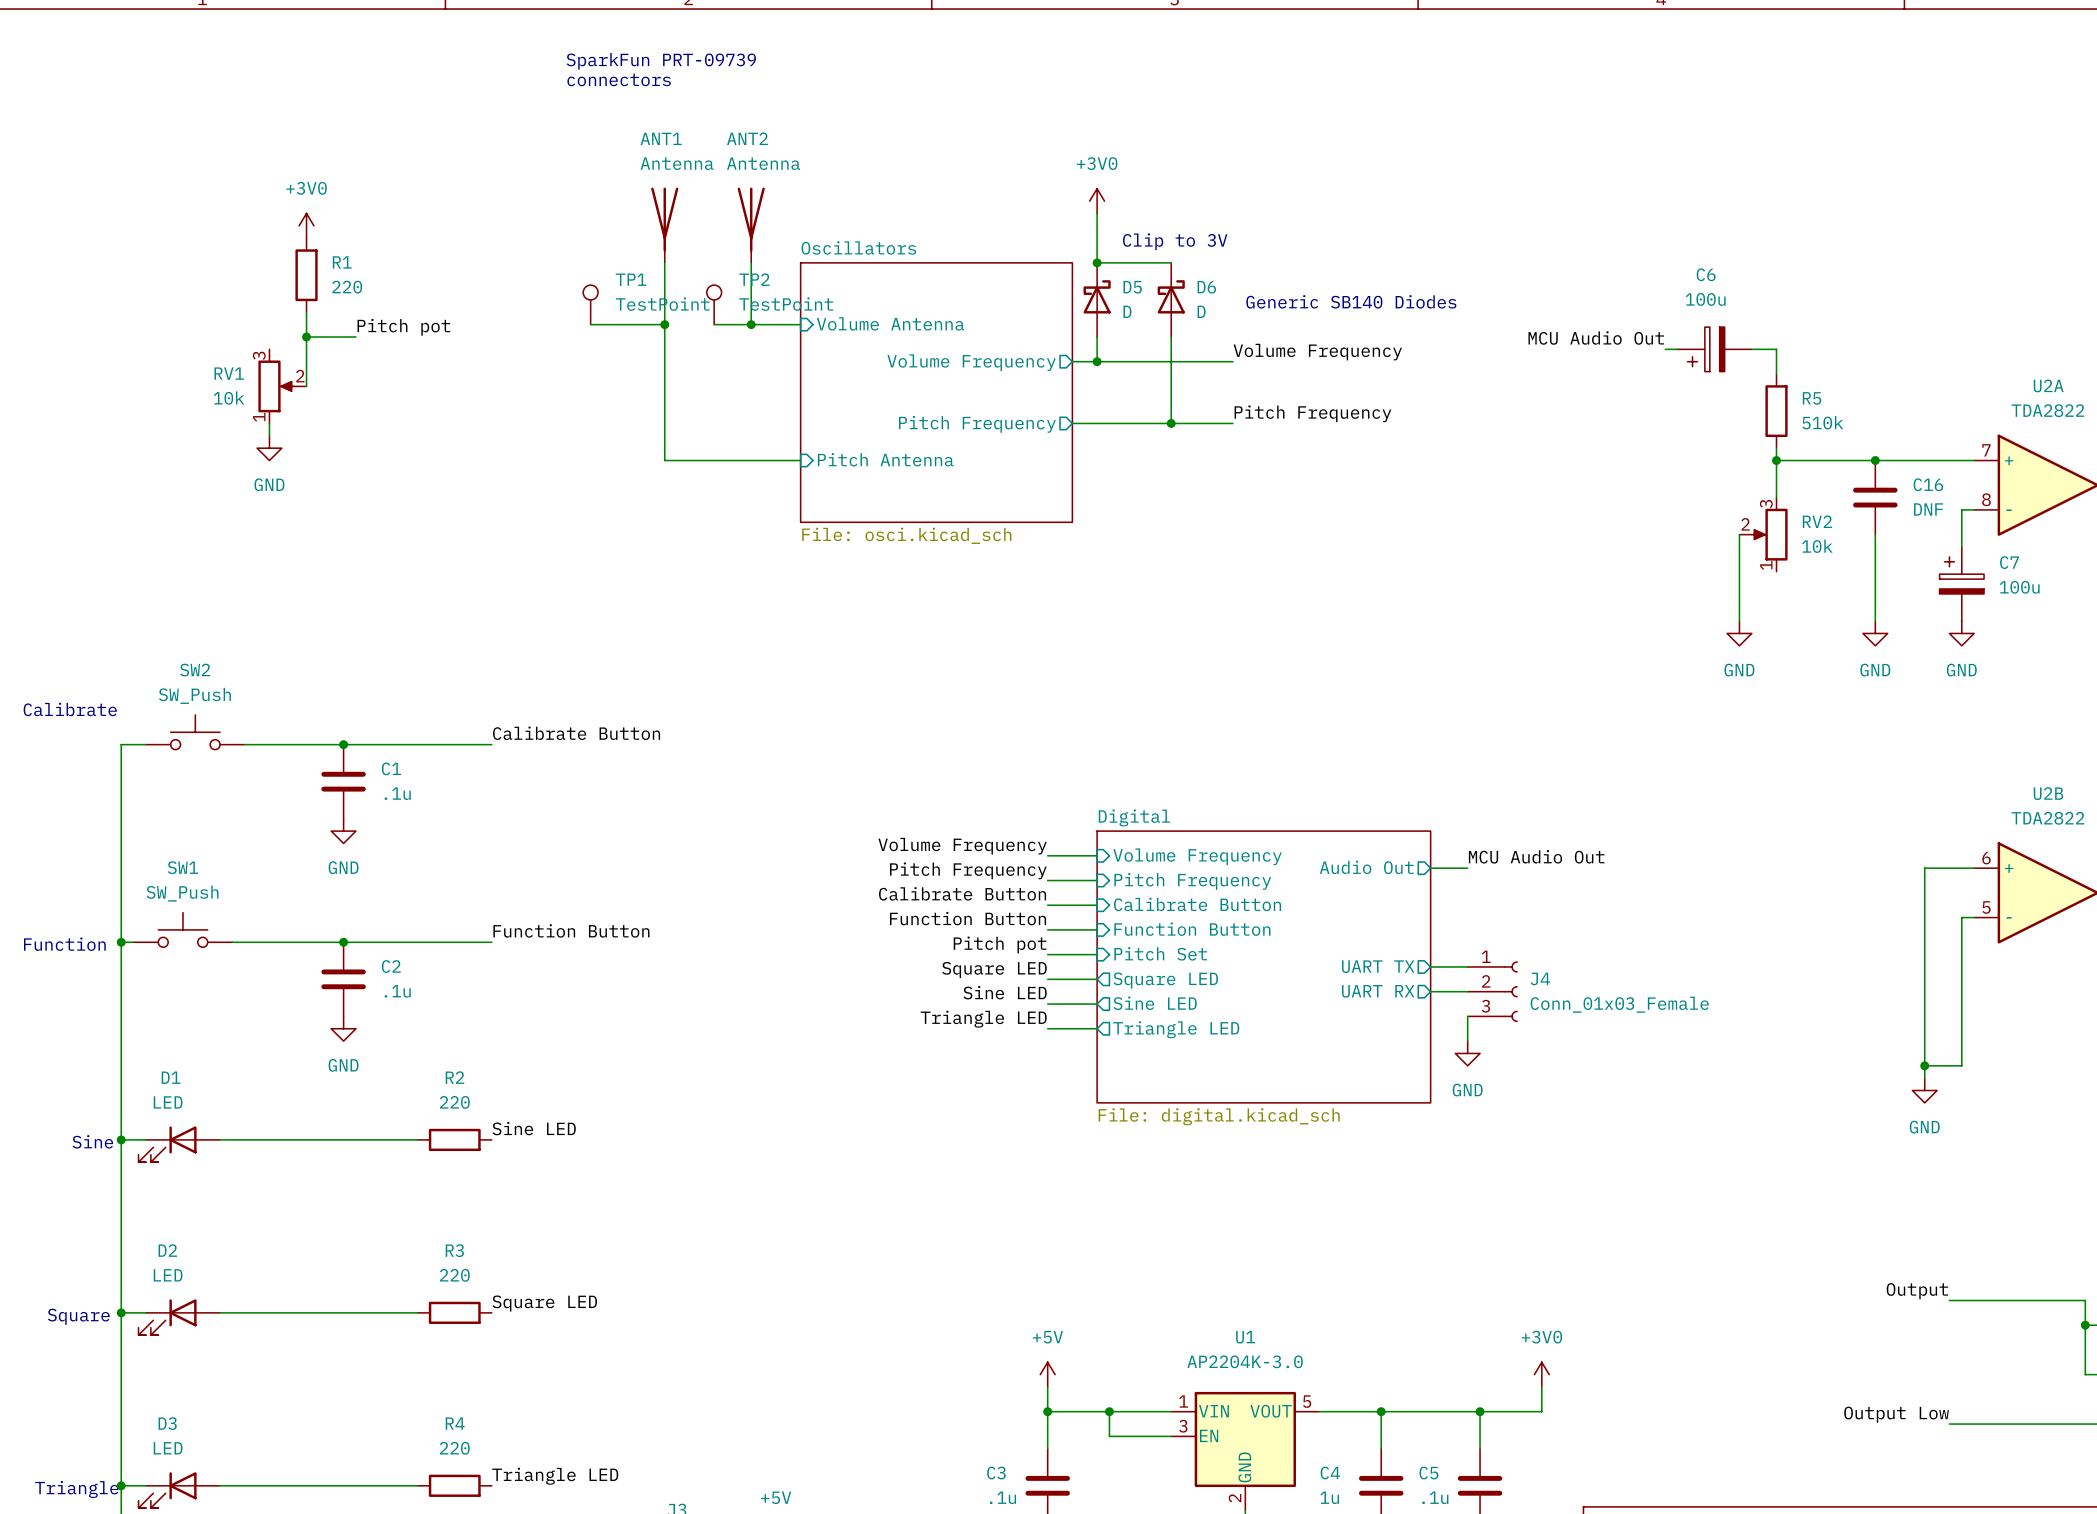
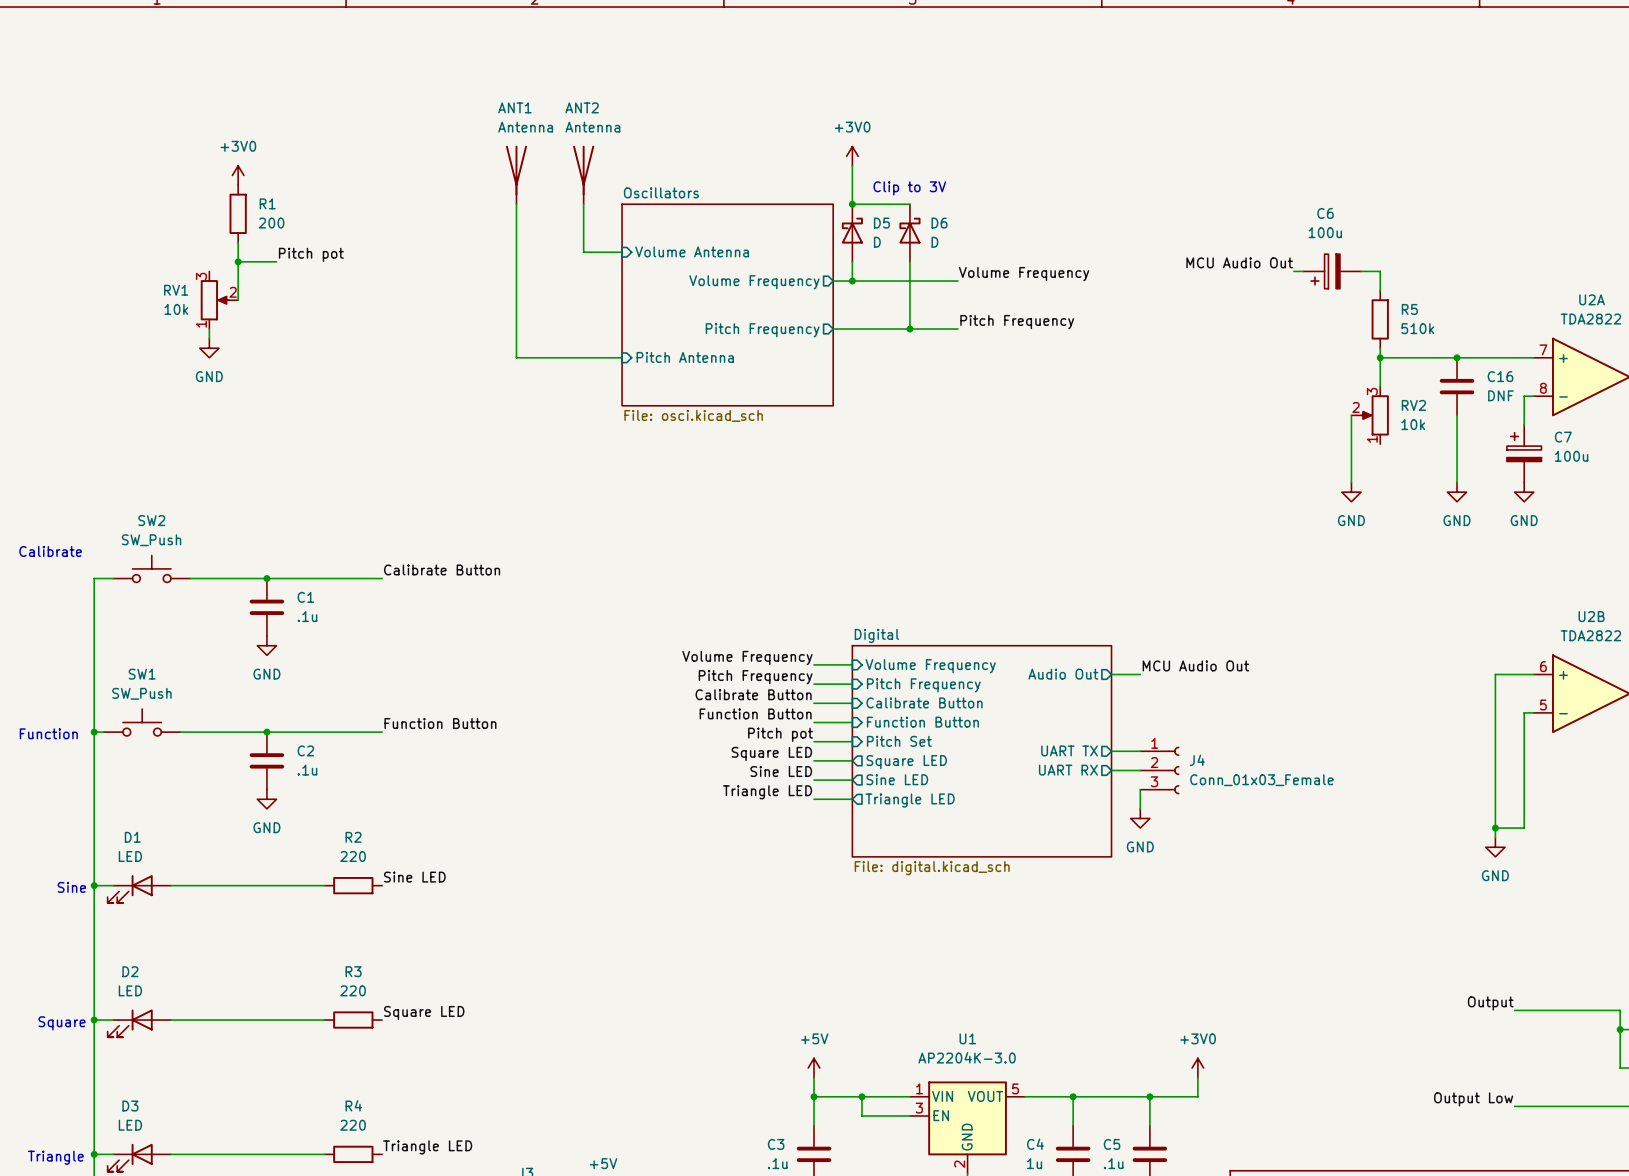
text: SparkFun PRT-09739 (661, 61) -> none
text: connectors (619, 79) -> none
R1 value: 220 (347, 287) -> 200 (271, 223)
text: Generic SB140 Diodes (1351, 301) -> none
TP1: TestPoint (590, 304) -> none
TP2: TestPoint (714, 304) -> none
wire: (590, 324) (664, 324) -> none
junction: (664, 324) -> none
wire: (714, 324) (751, 324) -> none
junction: (751, 324) -> none

